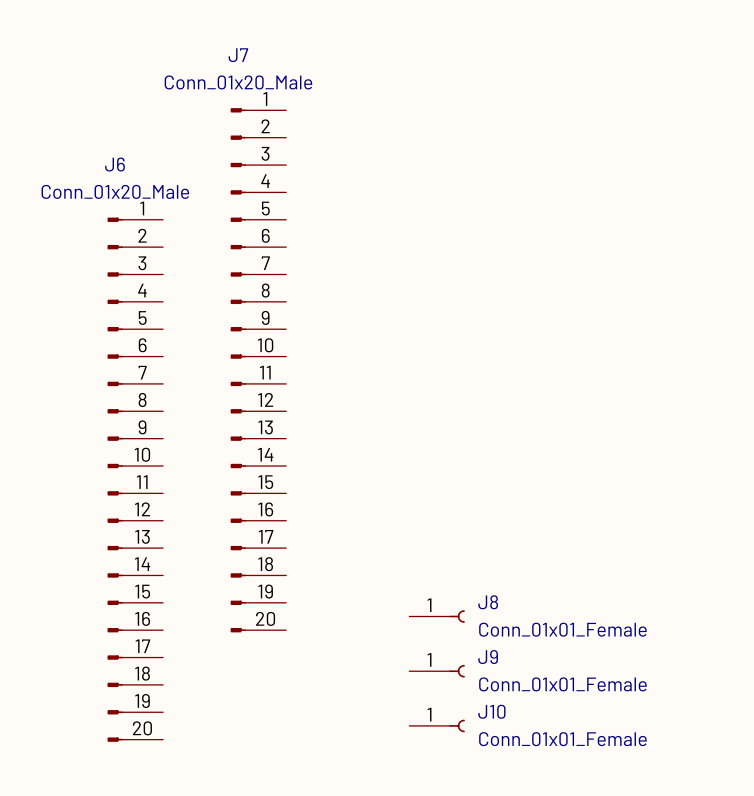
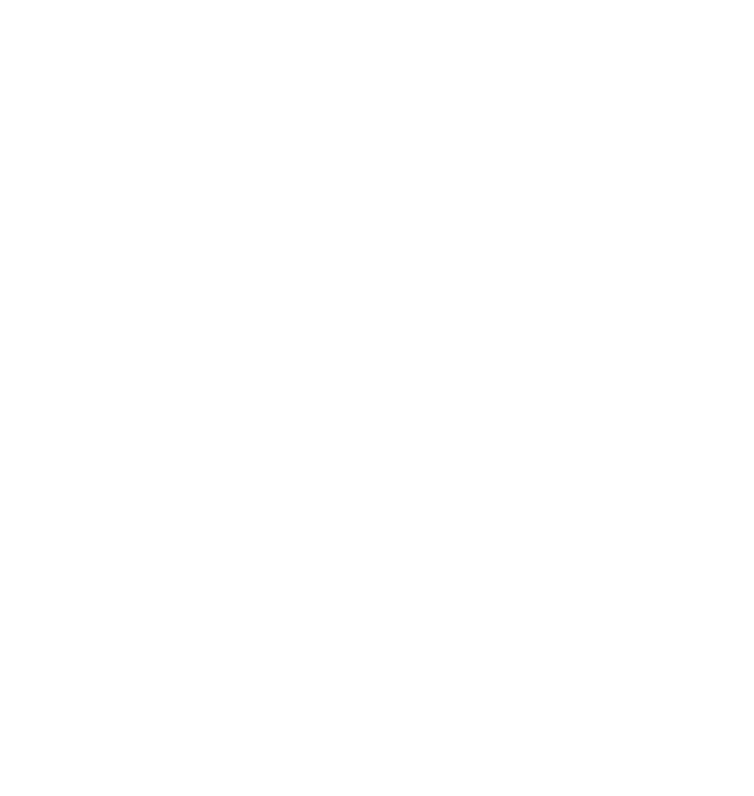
J7: Conn_01x20_Male (258, 370) -> none
J6: Conn_01x20_Male (135, 479) -> none
J8: Conn_01x01_Female (437, 616) -> none
J9: Conn_01x01_Female (437, 671) -> none
J10: Conn_01x01_Female (437, 725) -> none

